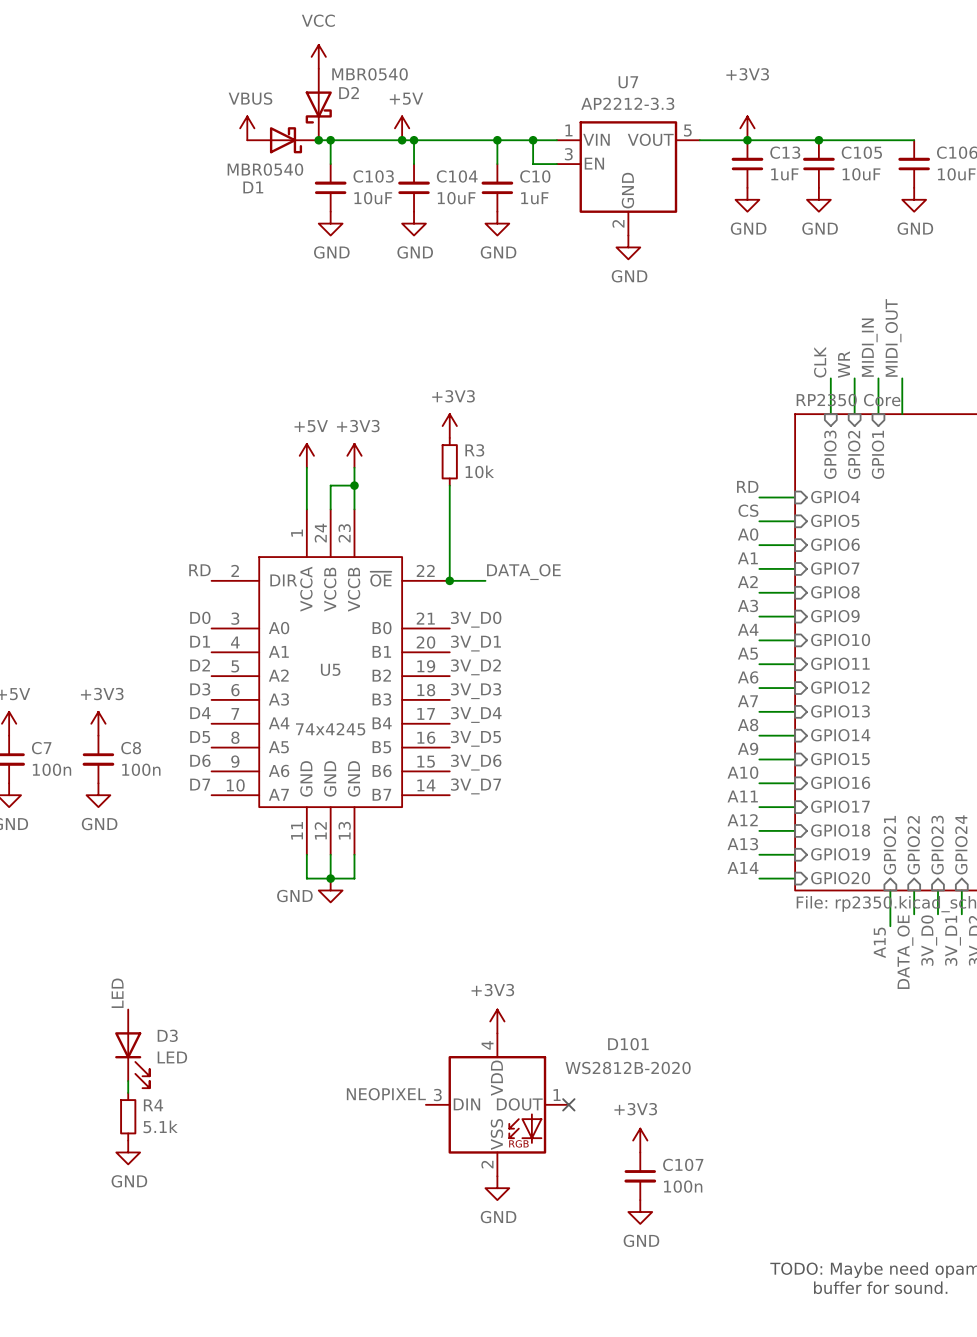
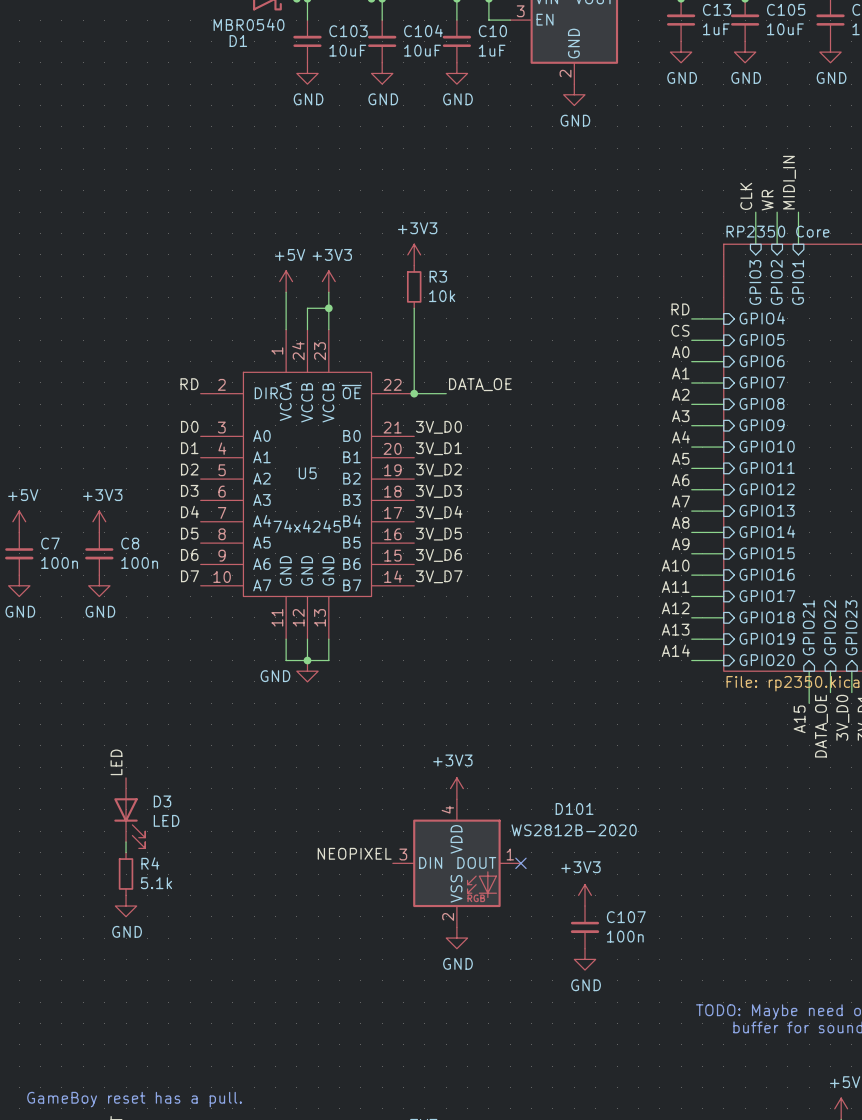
label: MIDI_OUT (893, 337) -> none
wire: (902, 378) (902, 414) -> none

